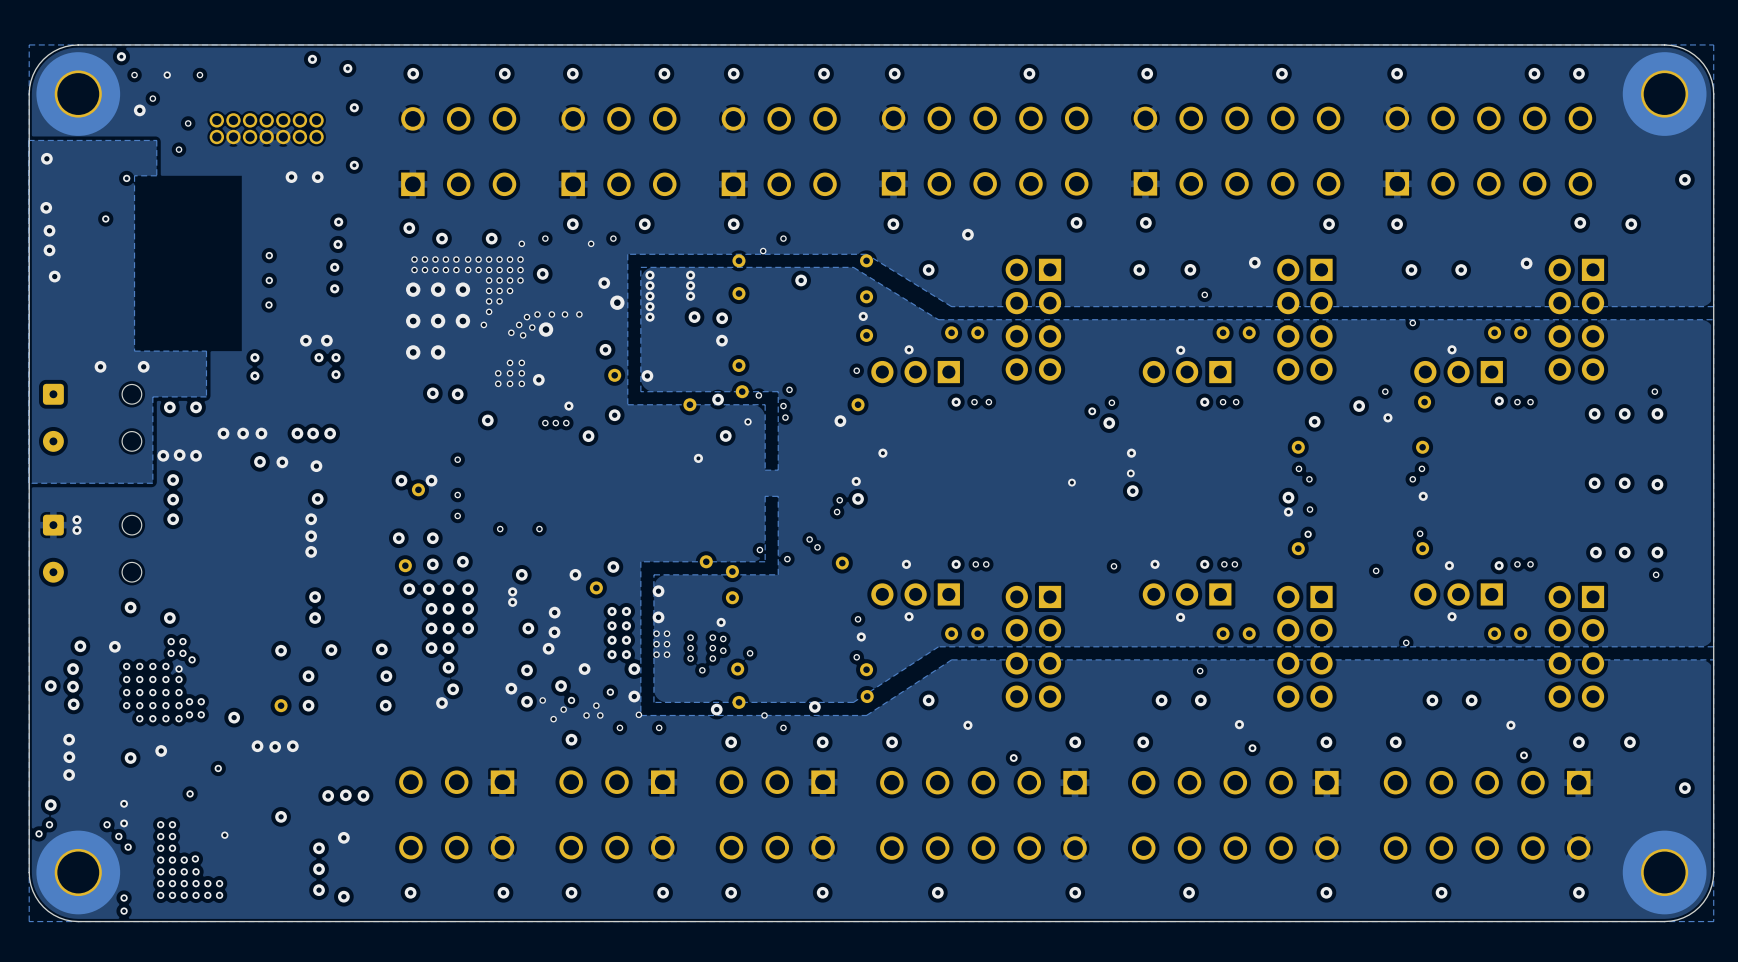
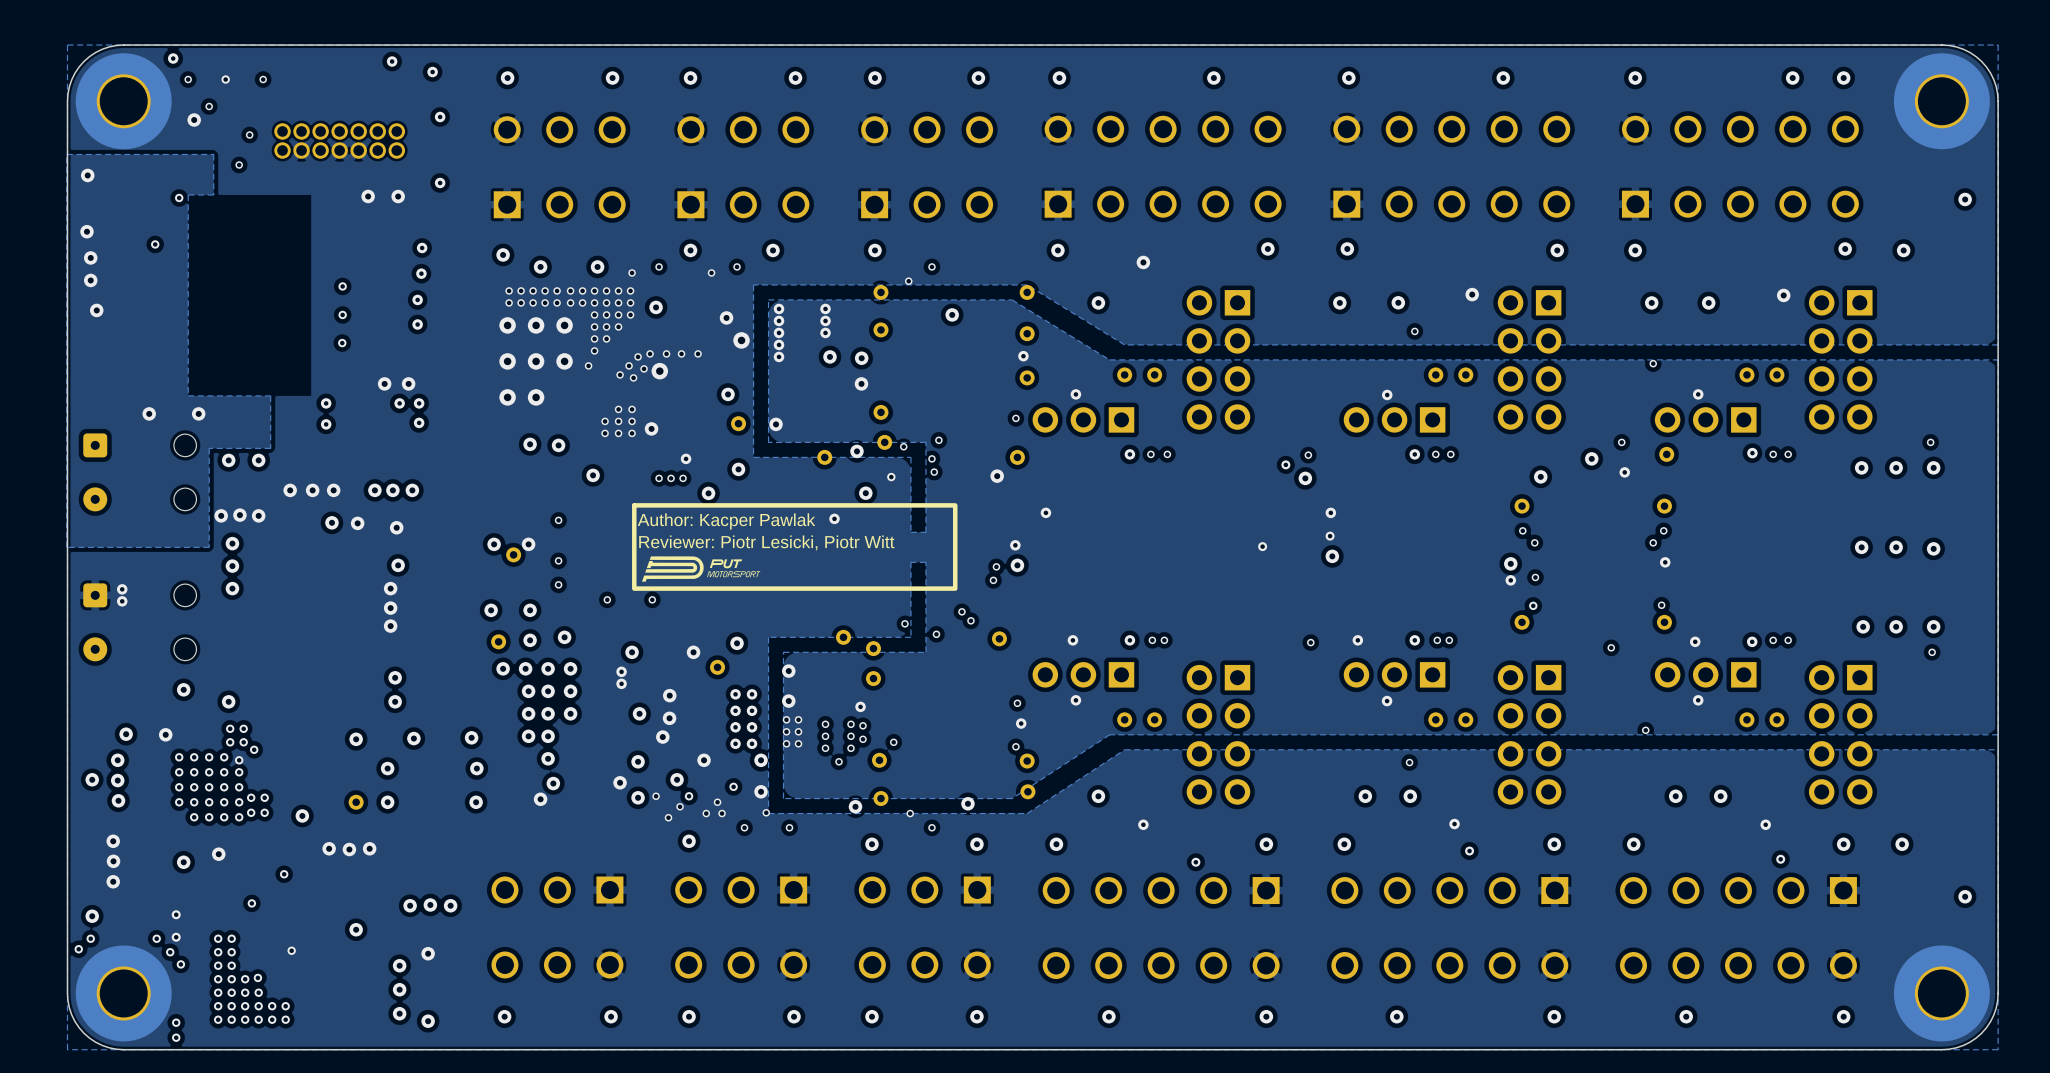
drawing: none -> [632, 503, 958, 591]

